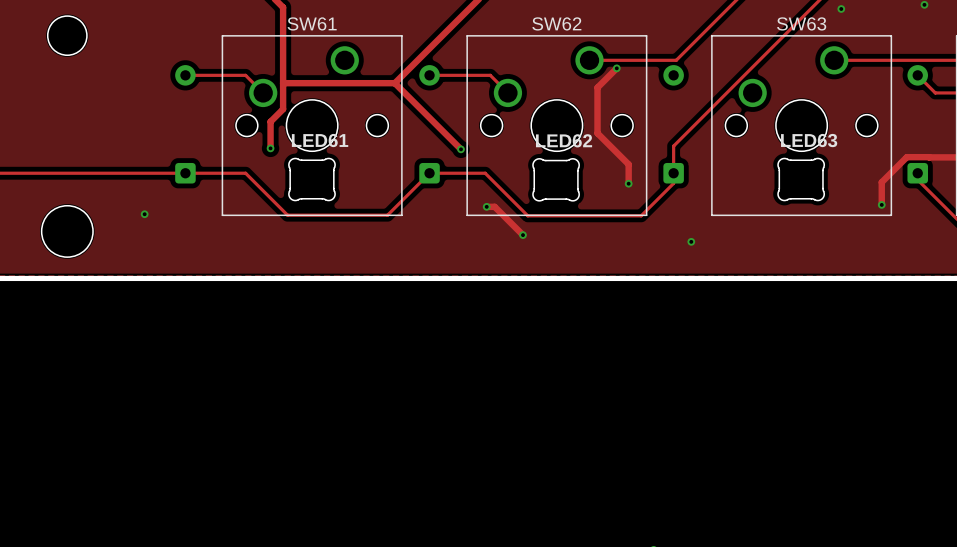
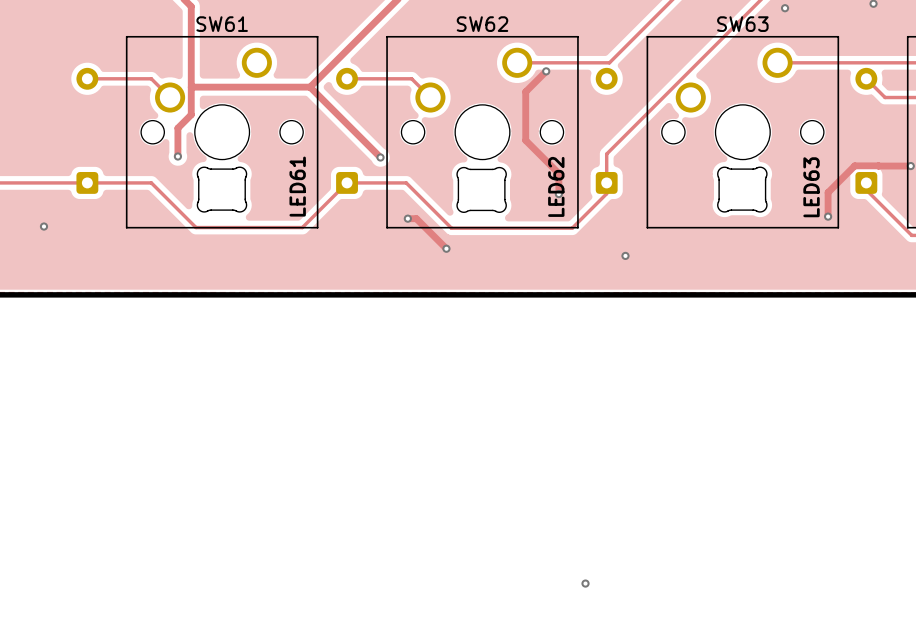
LED61 name rotation: 0° (320, 140) -> 90° counterclockwise (297, 186)
LED61 name position: LED61 (320, 140) -> LED61 (297, 186)
LED62 name rotation: 0° (564, 140) -> 90° counterclockwise (556, 186)
LED62 name position: LED62 (564, 140) -> LED62 (556, 186)
LED63 name rotation: 0° (809, 140) -> 90° counterclockwise (811, 187)

